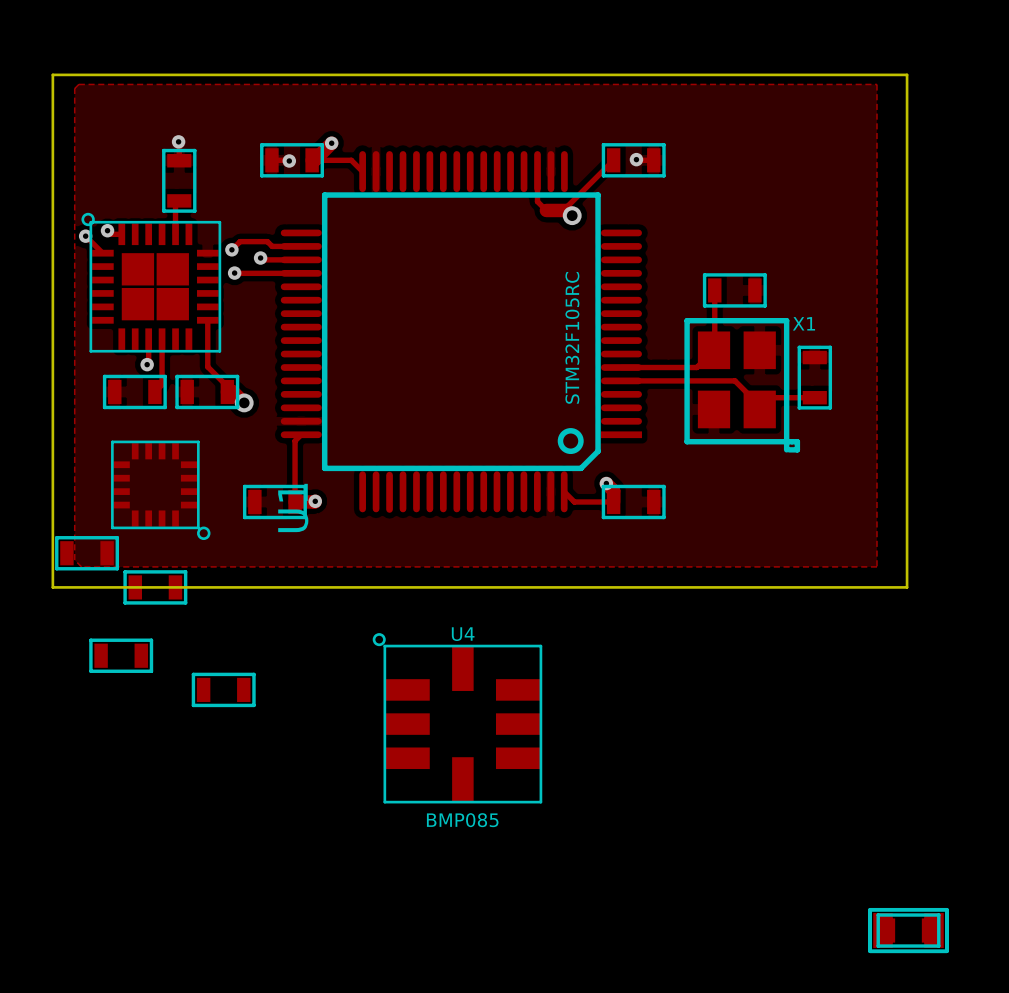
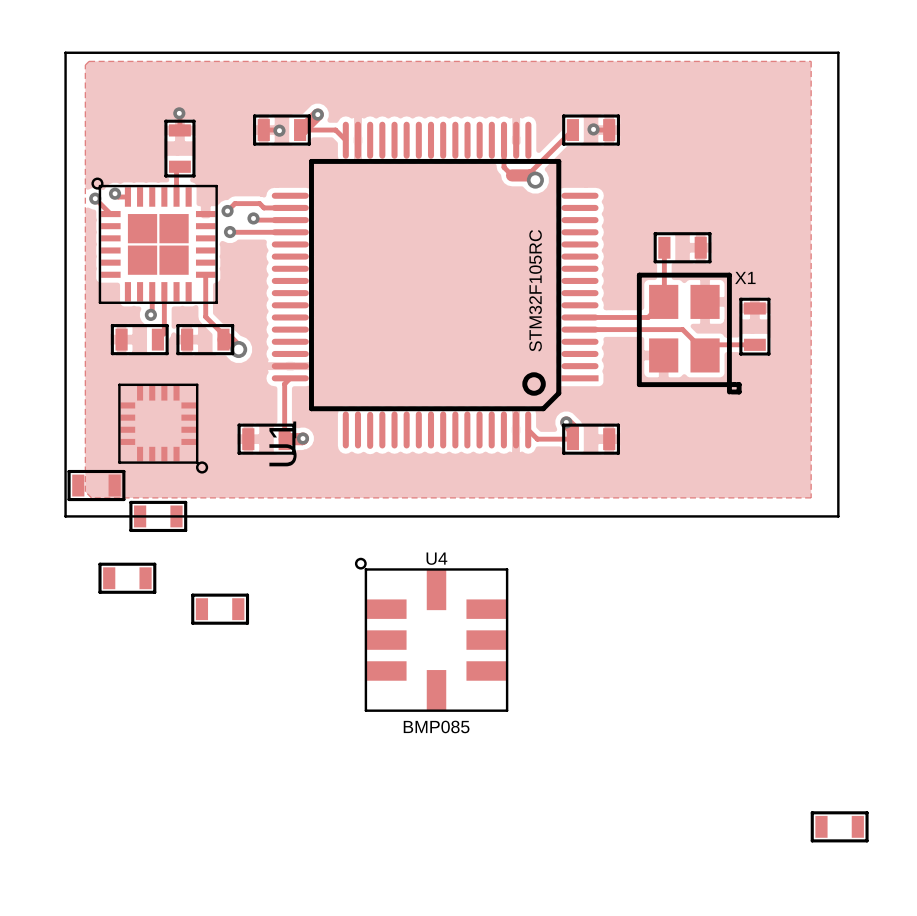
part: (908, 930) -> none

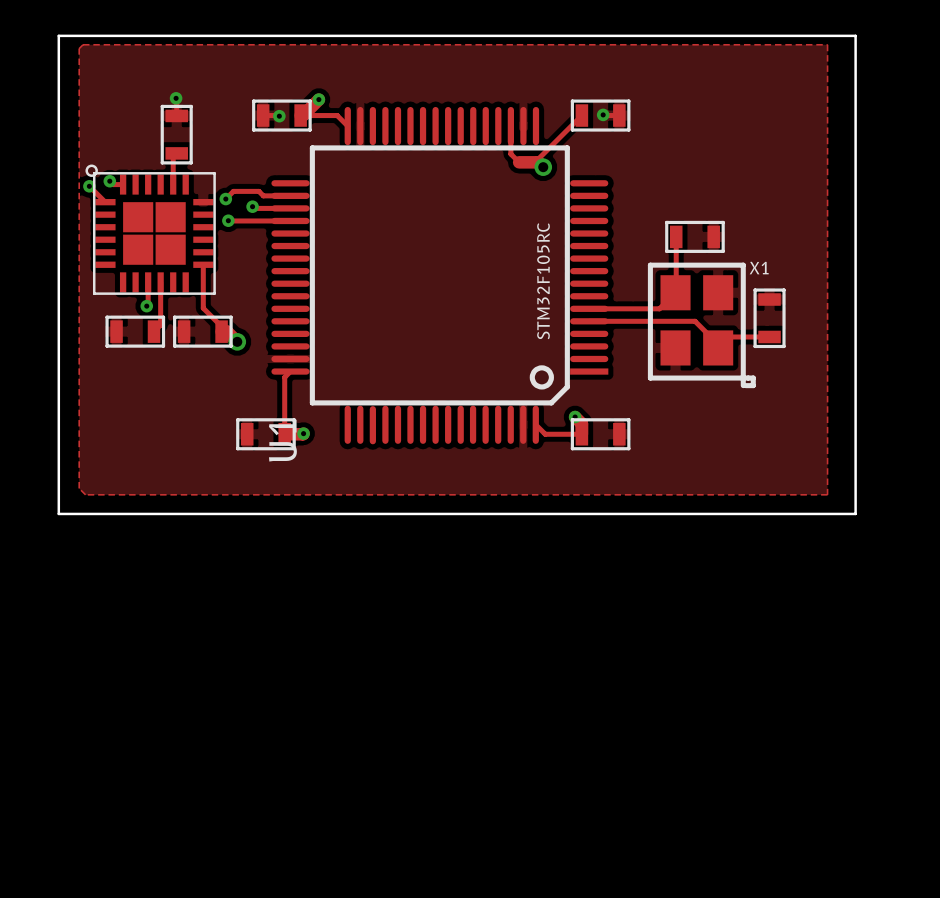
part: (163, 428) -> none
part: (96, 485) -> none
part: (158, 516) -> none
part: (127, 578) -> none
part: (220, 609) -> none
U4: BMP085 (431, 634) -> none
part: (839, 826) -> none

